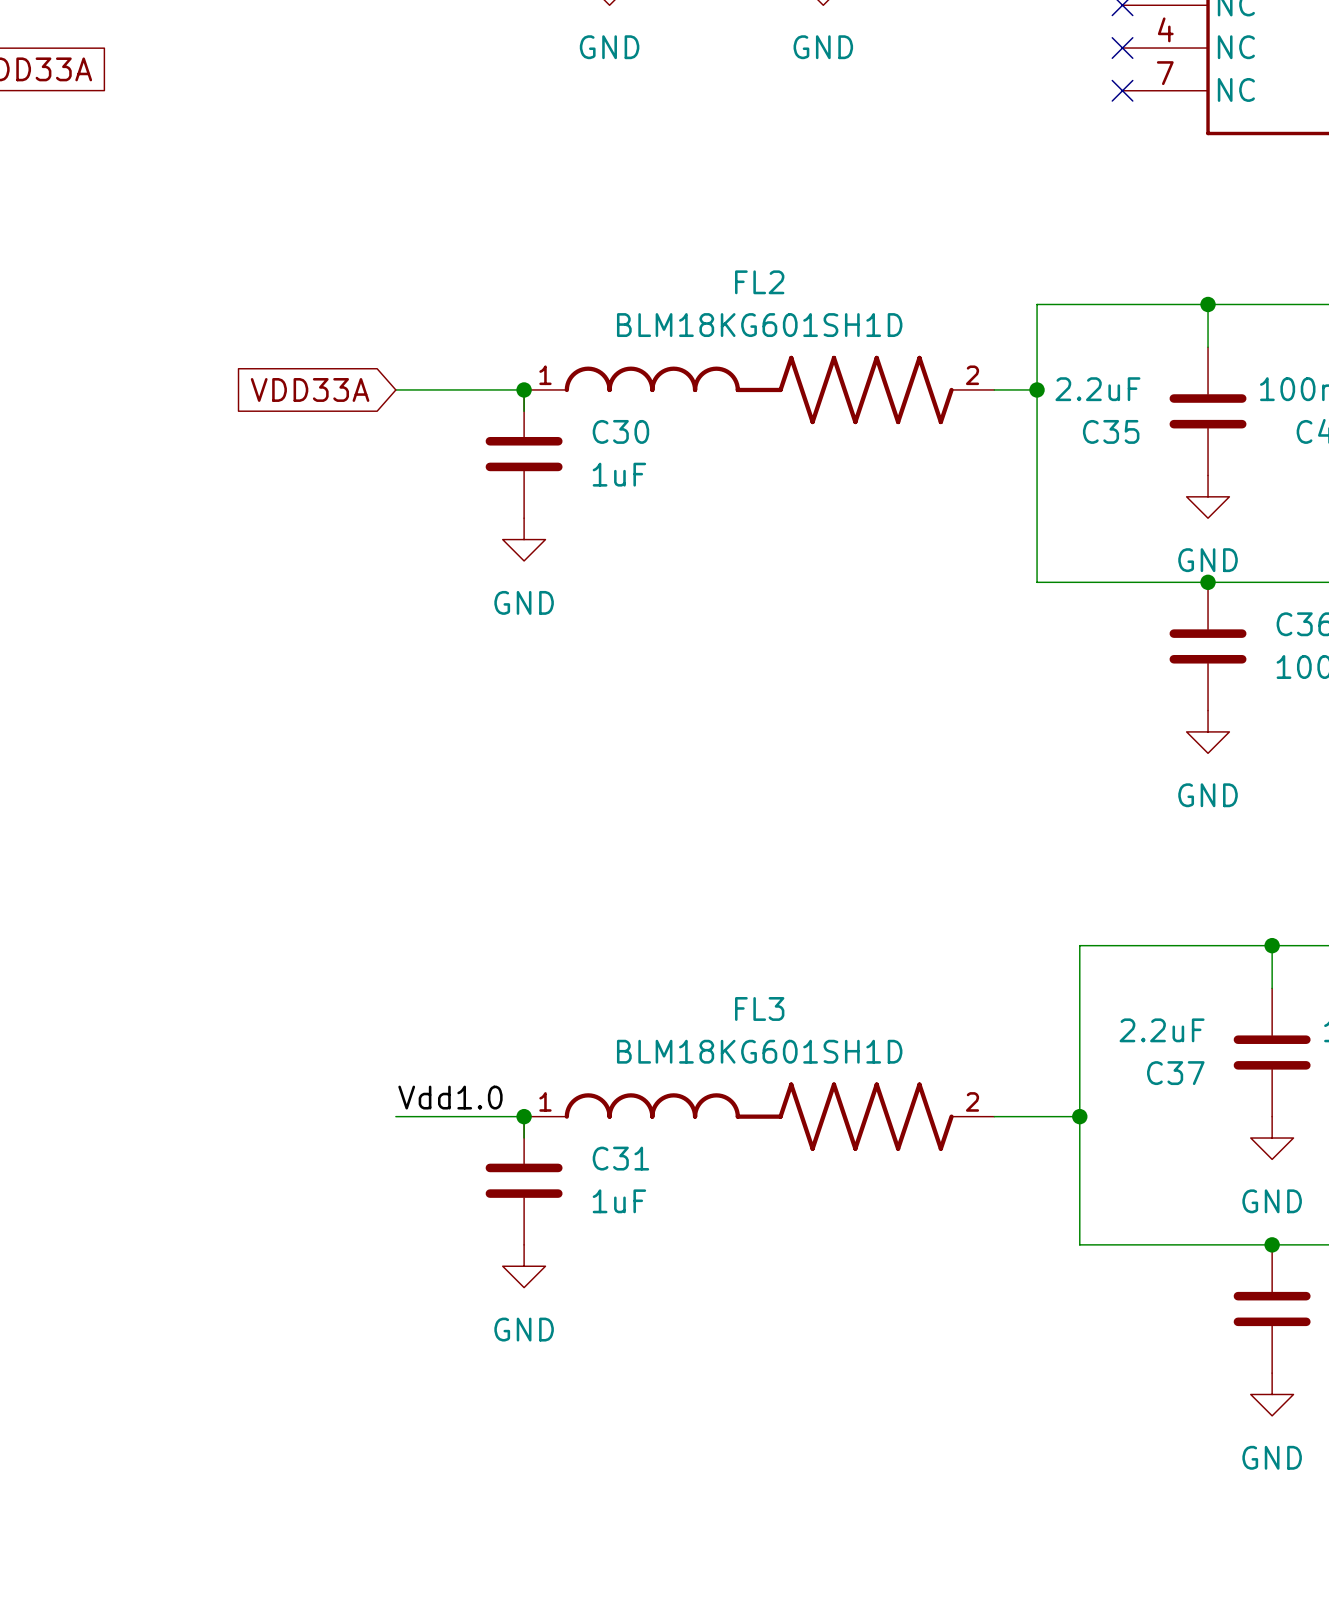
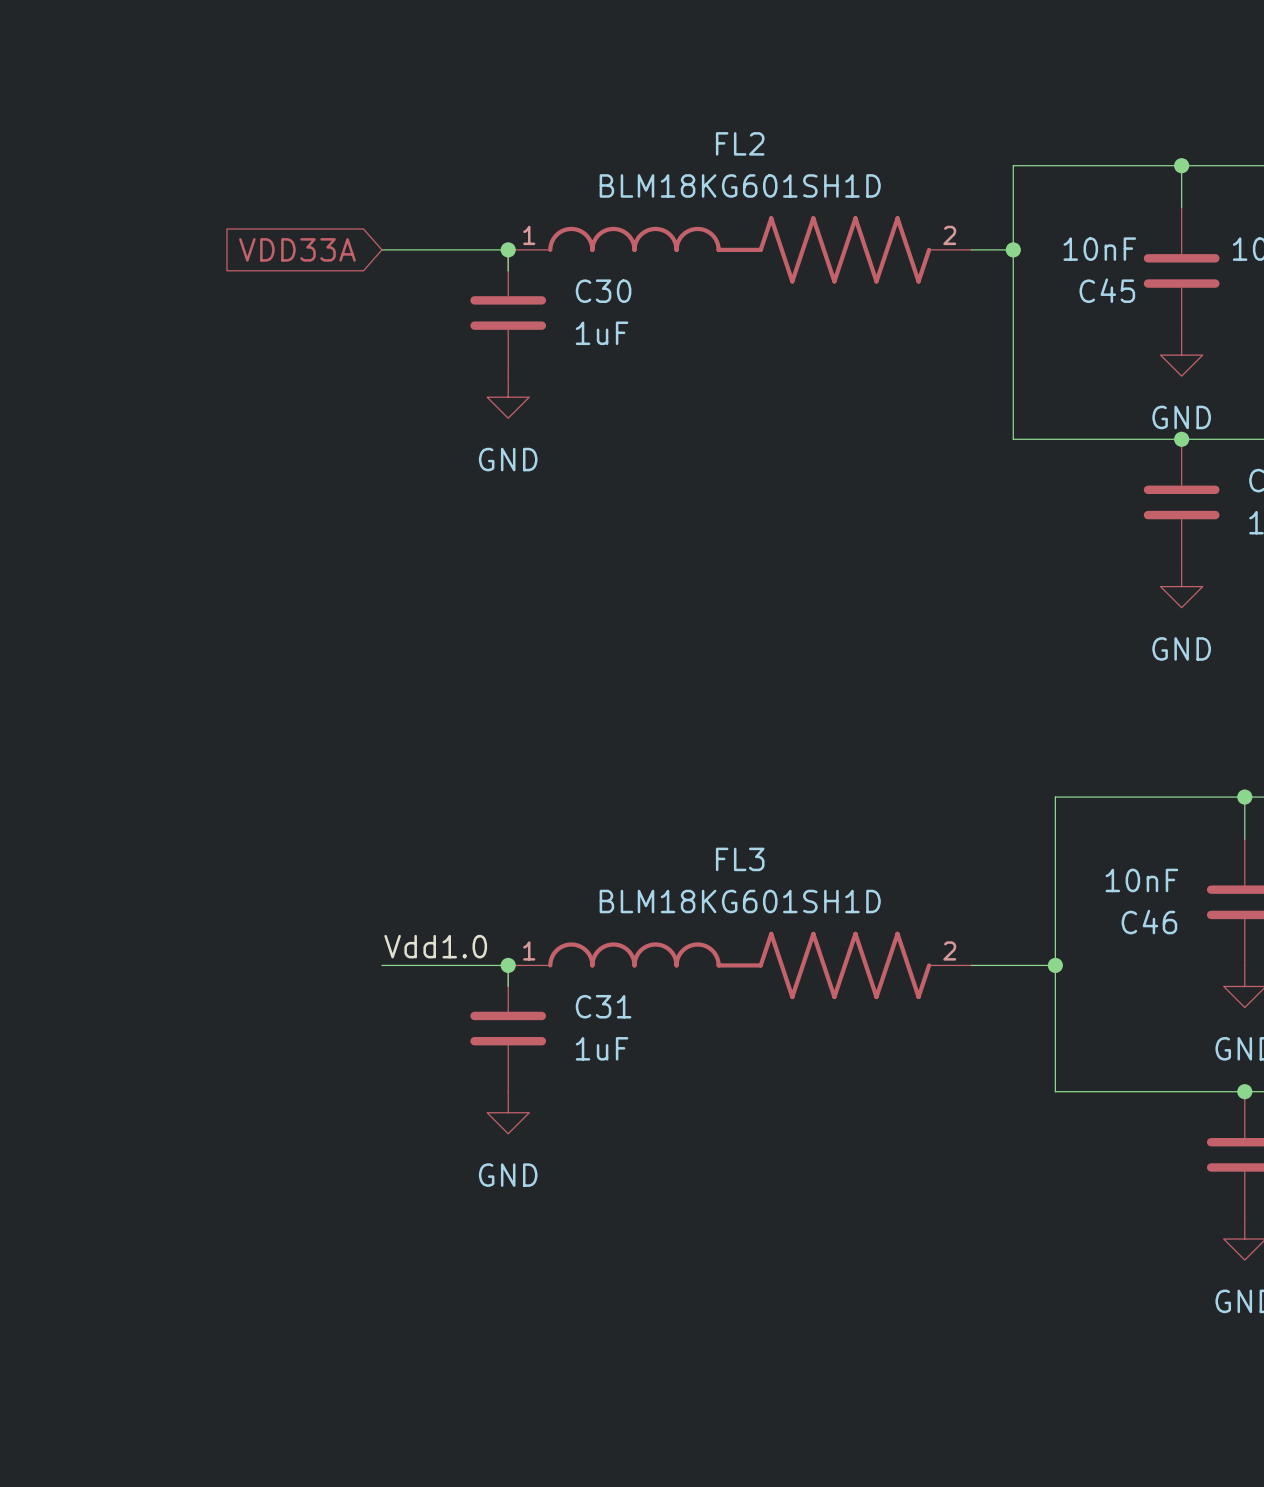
C35 value: 2.2uF (1097, 389) -> 10nF (1099, 249)
C35 name: C35 (1111, 431) -> C45 (1107, 290)
C37 value: 2.2uF (1162, 1030) -> 10nF (1141, 880)
C37 name: C37 (1175, 1073) -> C46 (1149, 922)

